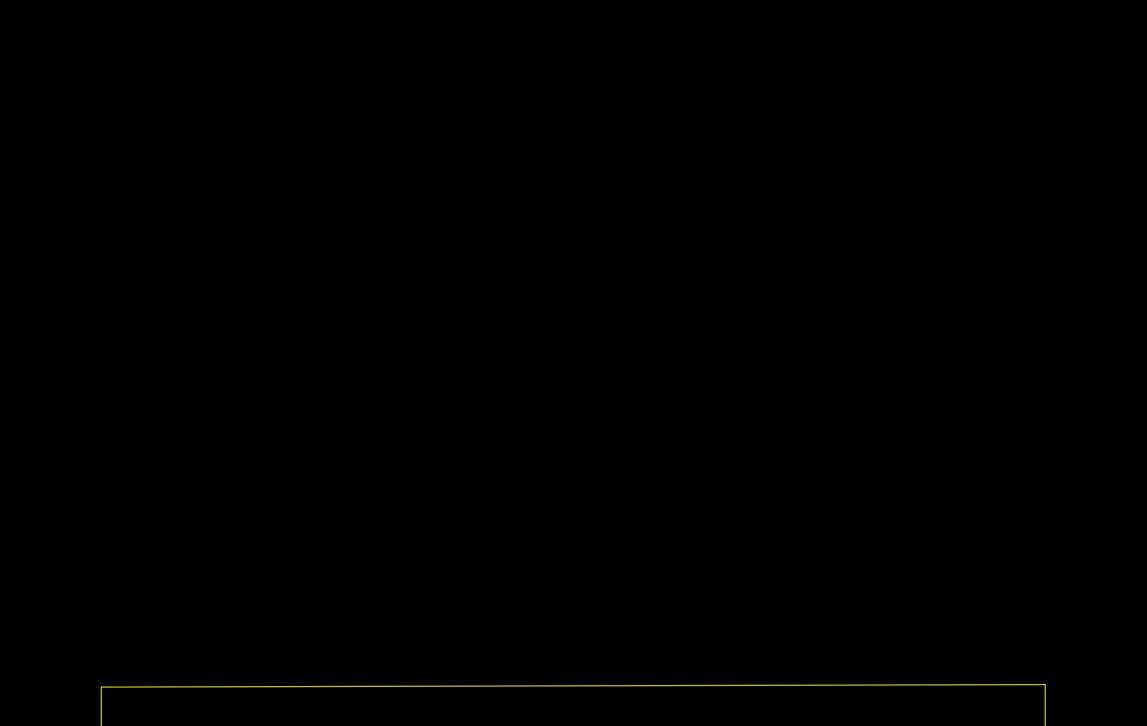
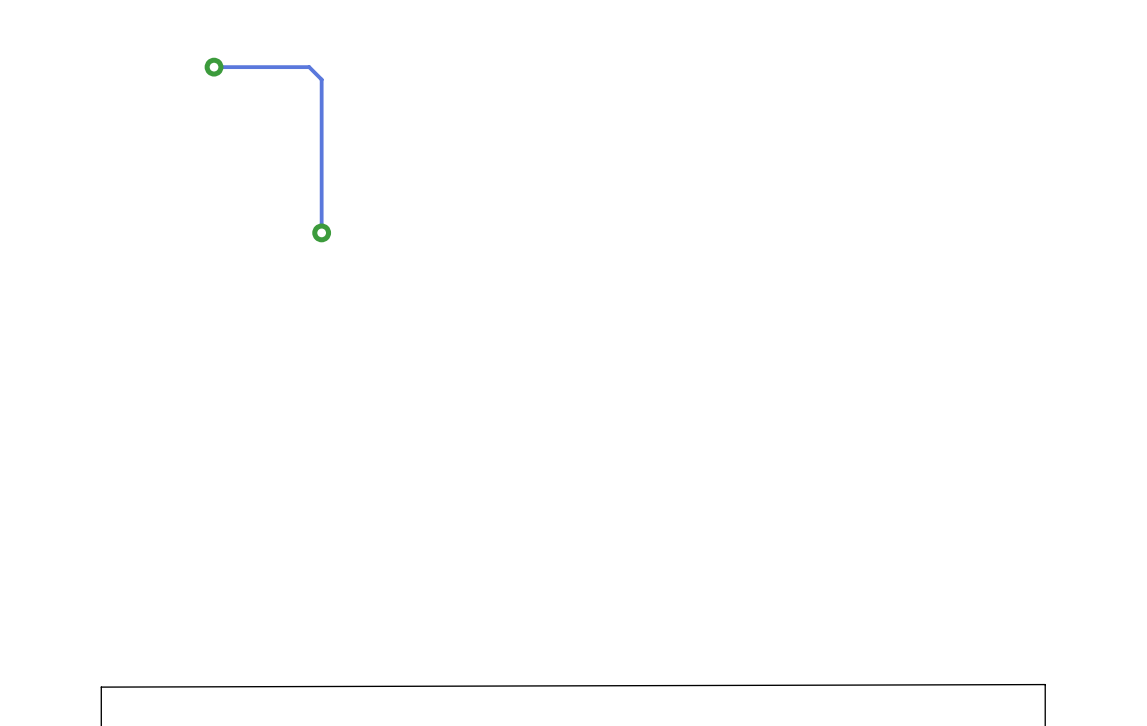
track: none -> (214, 67) (309, 67) (321, 79) (321, 232)
via: none -> (214, 67)
via: none -> (321, 232)

